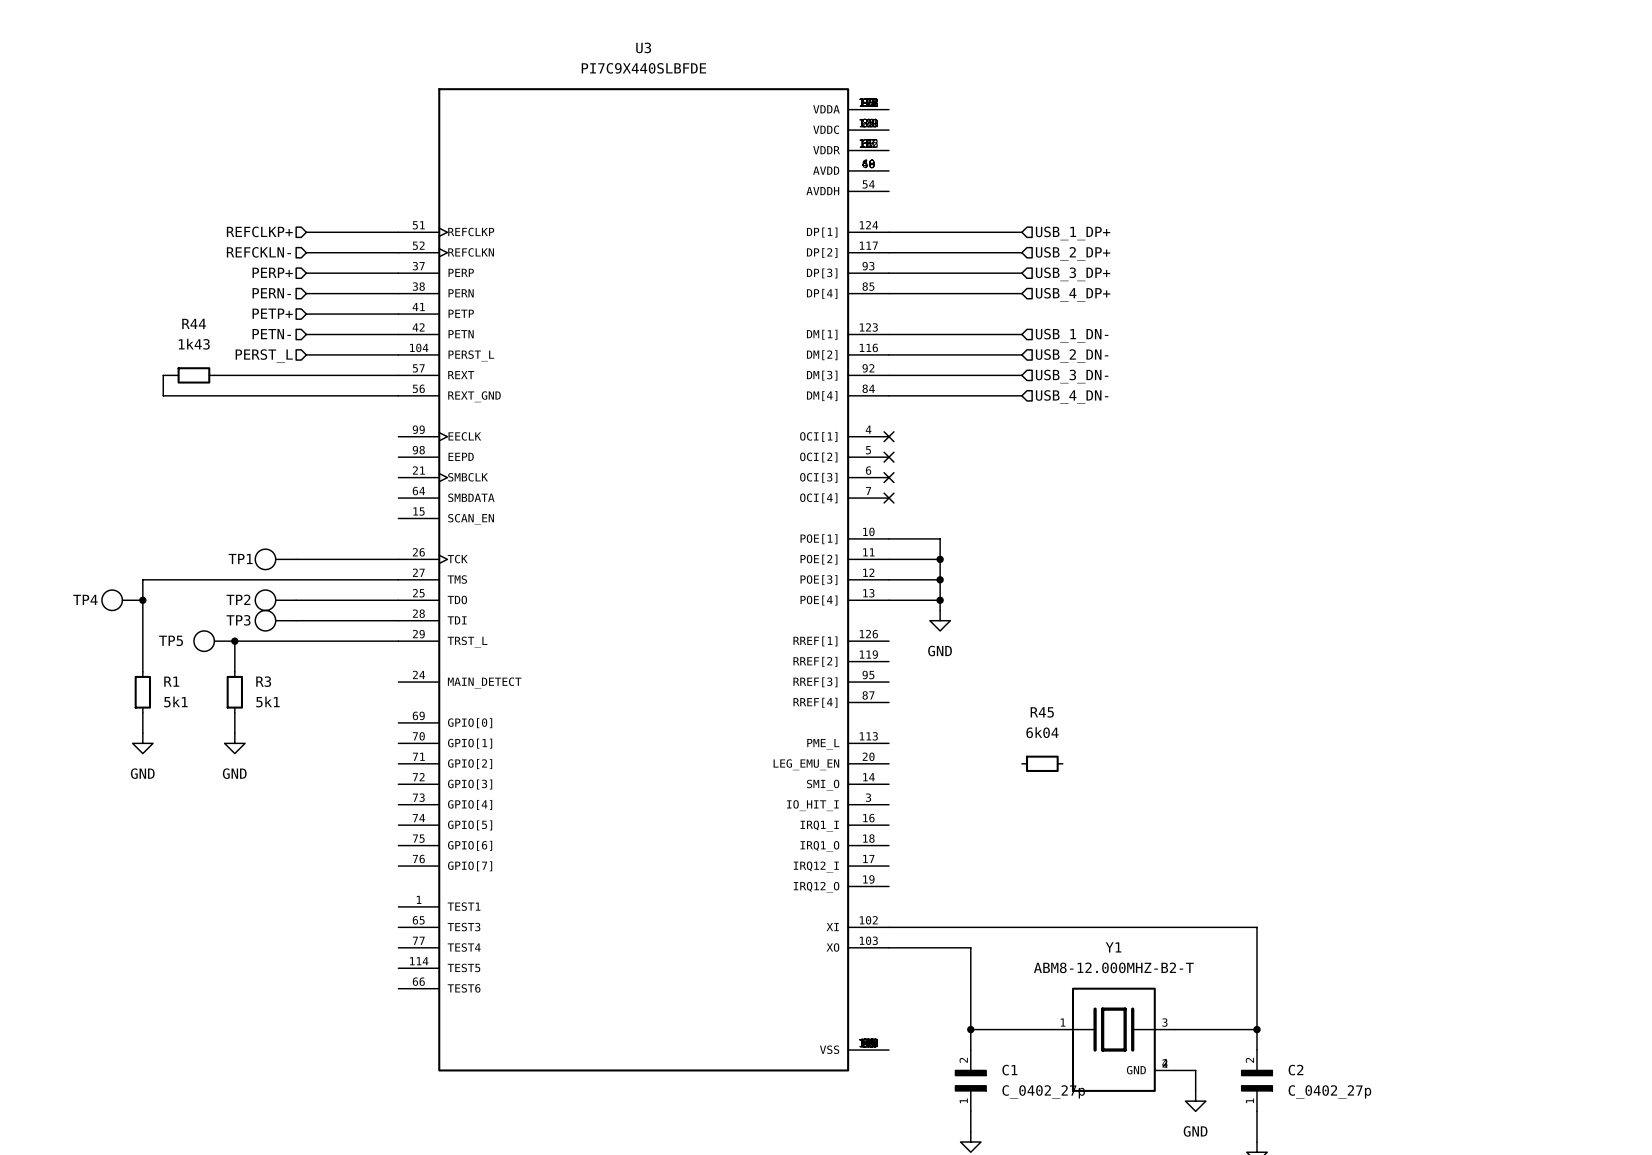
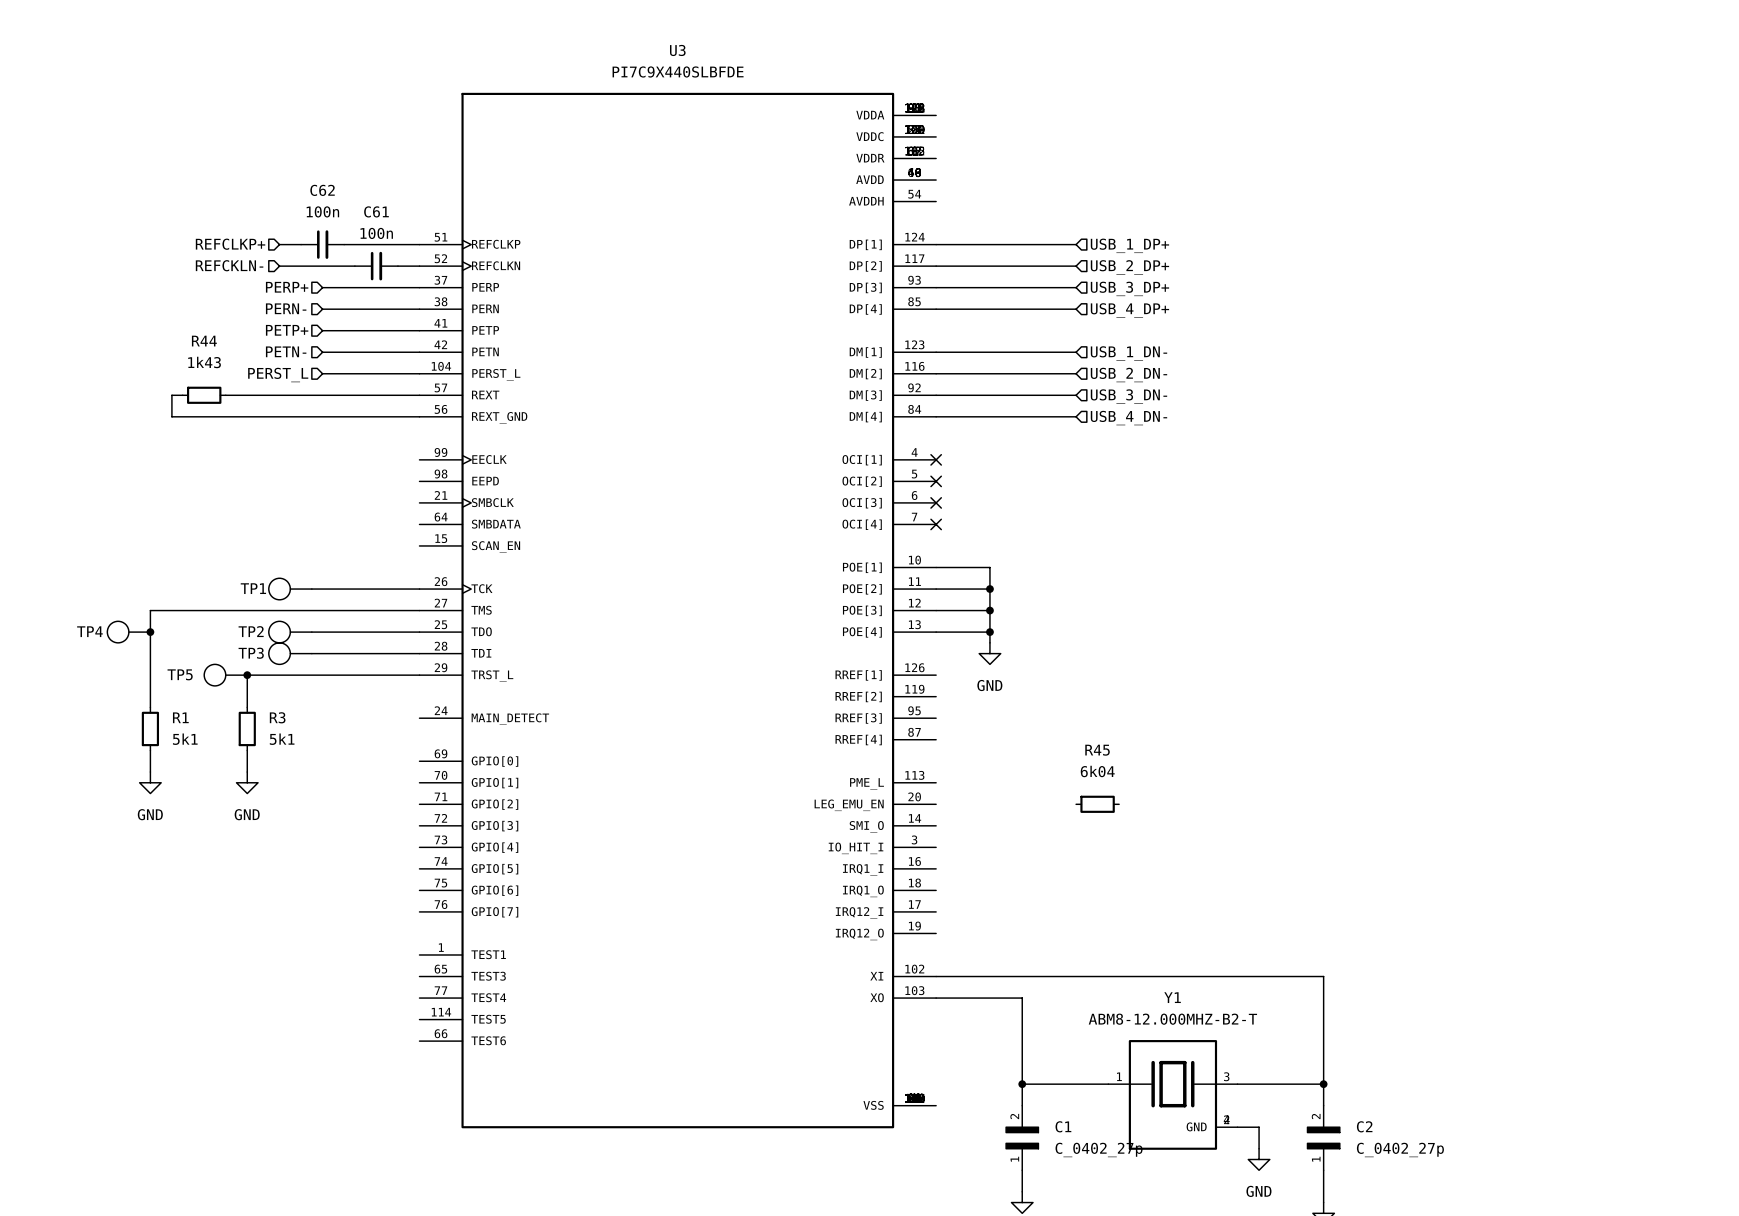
hierarchical label position: REFCLKP+ (259, 231) -> REFCLKP+ (230, 244)
C62: none -> (322, 244)
hierarchical label position: REFCKLN- (258, 252) -> REFCKLN- (229, 265)
C61: none -> (376, 266)

